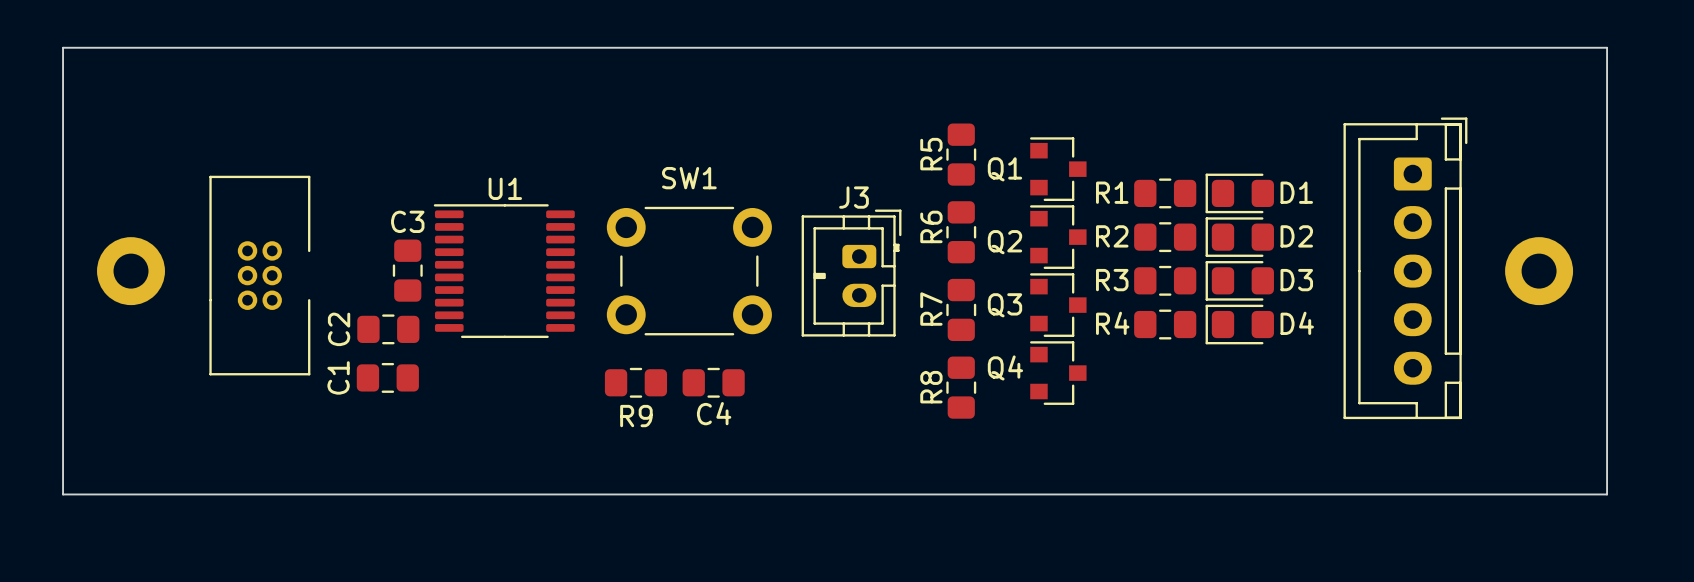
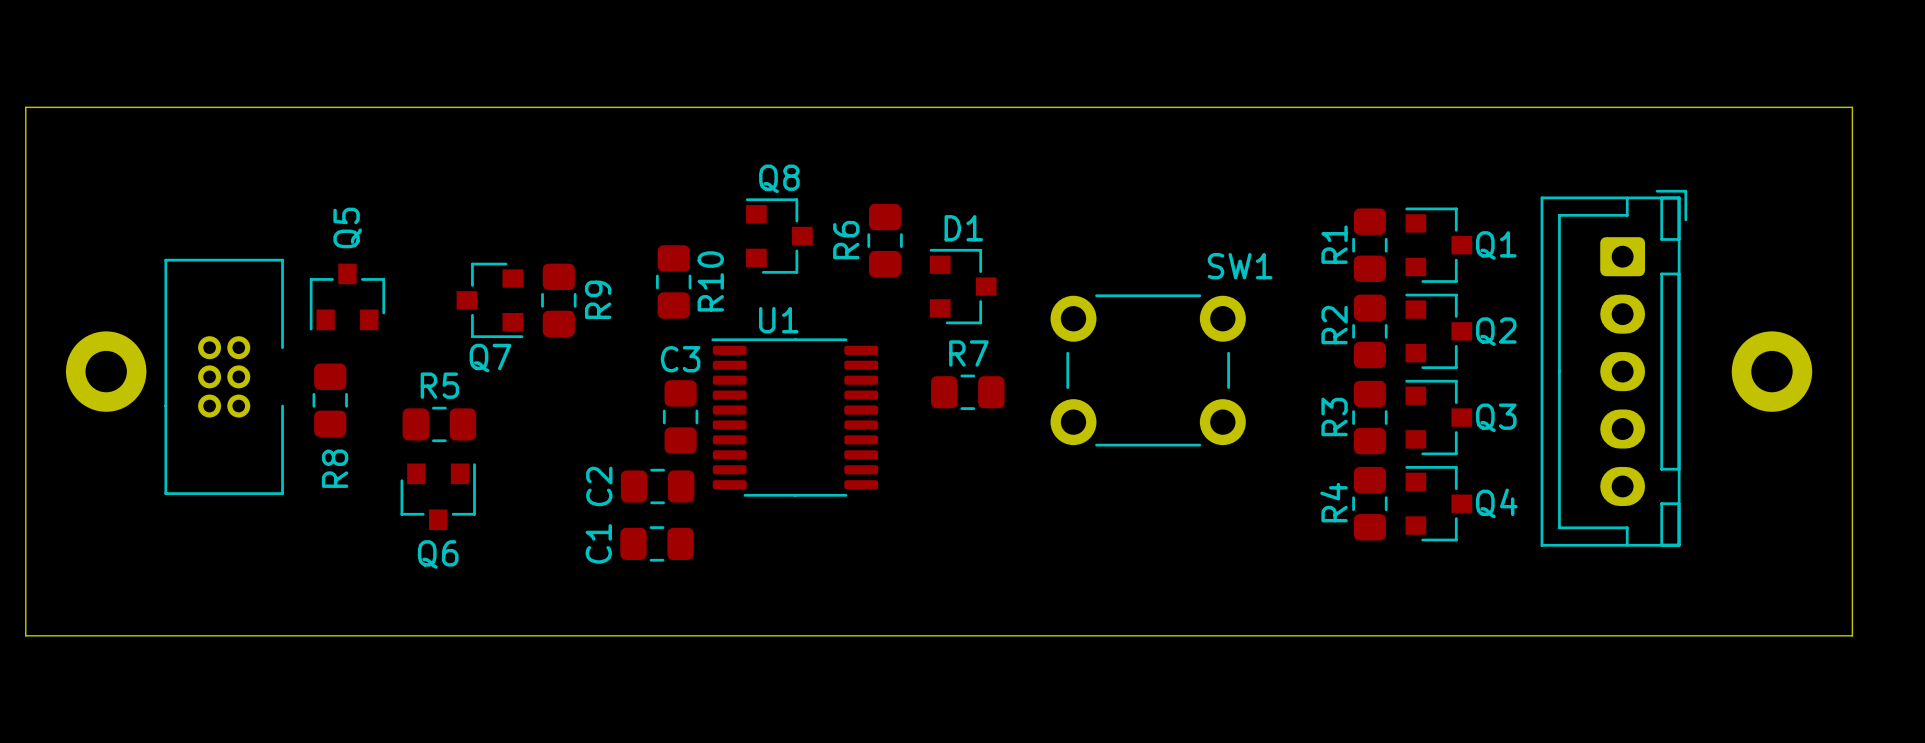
R5 rotation: 0° (961, 154) -> 90° clockwise (439, 424)
R5 position: (961, 154) -> (439, 424)
Q8: none -> (779, 236)
Q1 name position: Q1 (1004, 169) -> Q1 (1496, 245)
Q1 position: (1058, 169) -> (1438, 245)
D1 footprint: [1205, 173, 1274, 214] -> [929, 248, 997, 325]
SW1 name position: SW1 (689, 178) -> SW1 (1240, 266)
U1 name position: U1 (505, 188) -> U1 (778, 320)
D1 name position: D1 (1296, 192) -> D1 (963, 228)
R1 rotation: 0° (1165, 193) -> 90° clockwise (1369, 245)
R1 position: (1165, 193) -> (1369, 245)
R10: none -> (673, 281)
Q5: none -> (347, 297)
Q7: none -> (490, 300)
R6 name position: R6 (931, 226) -> R6 (846, 240)
R6 position: (961, 232) -> (885, 240)
Q2 position: (1058, 237) -> (1438, 331)
R2 rotation: 0° (1165, 237) -> 90° clockwise (1369, 331)
D2: (1239, 237) -> none
Q2 name position: Q2 (1004, 242) -> Q2 (1496, 331)
C3 position: (407, 270) -> (680, 416)
U1 position: (504, 271) -> (794, 417)
SW1 position: (689, 271) -> (1148, 370)
J3: (851, 273) -> none
part position: (259, 275) -> (224, 376)
R3 rotation: 0° (1165, 280) -> 90° clockwise (1369, 417)
R3 position: (1165, 280) -> (1369, 417)
D3: (1239, 280) -> none
Q3 name position: Q3 (1004, 305) -> Q3 (1496, 417)
Q3 position: (1058, 305) -> (1438, 417)
R7 rotation: 0° (961, 309) -> 90° clockwise (967, 392)
R7 position: (961, 309) -> (967, 392)
R4 rotation: 0° (1165, 324) -> 90° clockwise (1369, 503)
R4 position: (1165, 324) -> (1369, 503)
D4: (1239, 324) -> none
C2 position: (388, 329) -> (657, 486)
Q4 name position: Q4 (1005, 367) -> Q4 (1496, 503)
Q4 position: (1058, 373) -> (1438, 503)
Q6: none -> (438, 496)
C1 position: (387, 377) -> (657, 543)
R9 rotation: 0° (635, 382) -> 90° clockwise (558, 300)
R9 position: (635, 382) -> (558, 300)
C4: (713, 382) -> none
R8 name position: R8 (931, 387) -> R8 (335, 468)
R8 position: (961, 387) -> (330, 400)
R9 name position: R9 (636, 416) -> R9 (598, 299)

